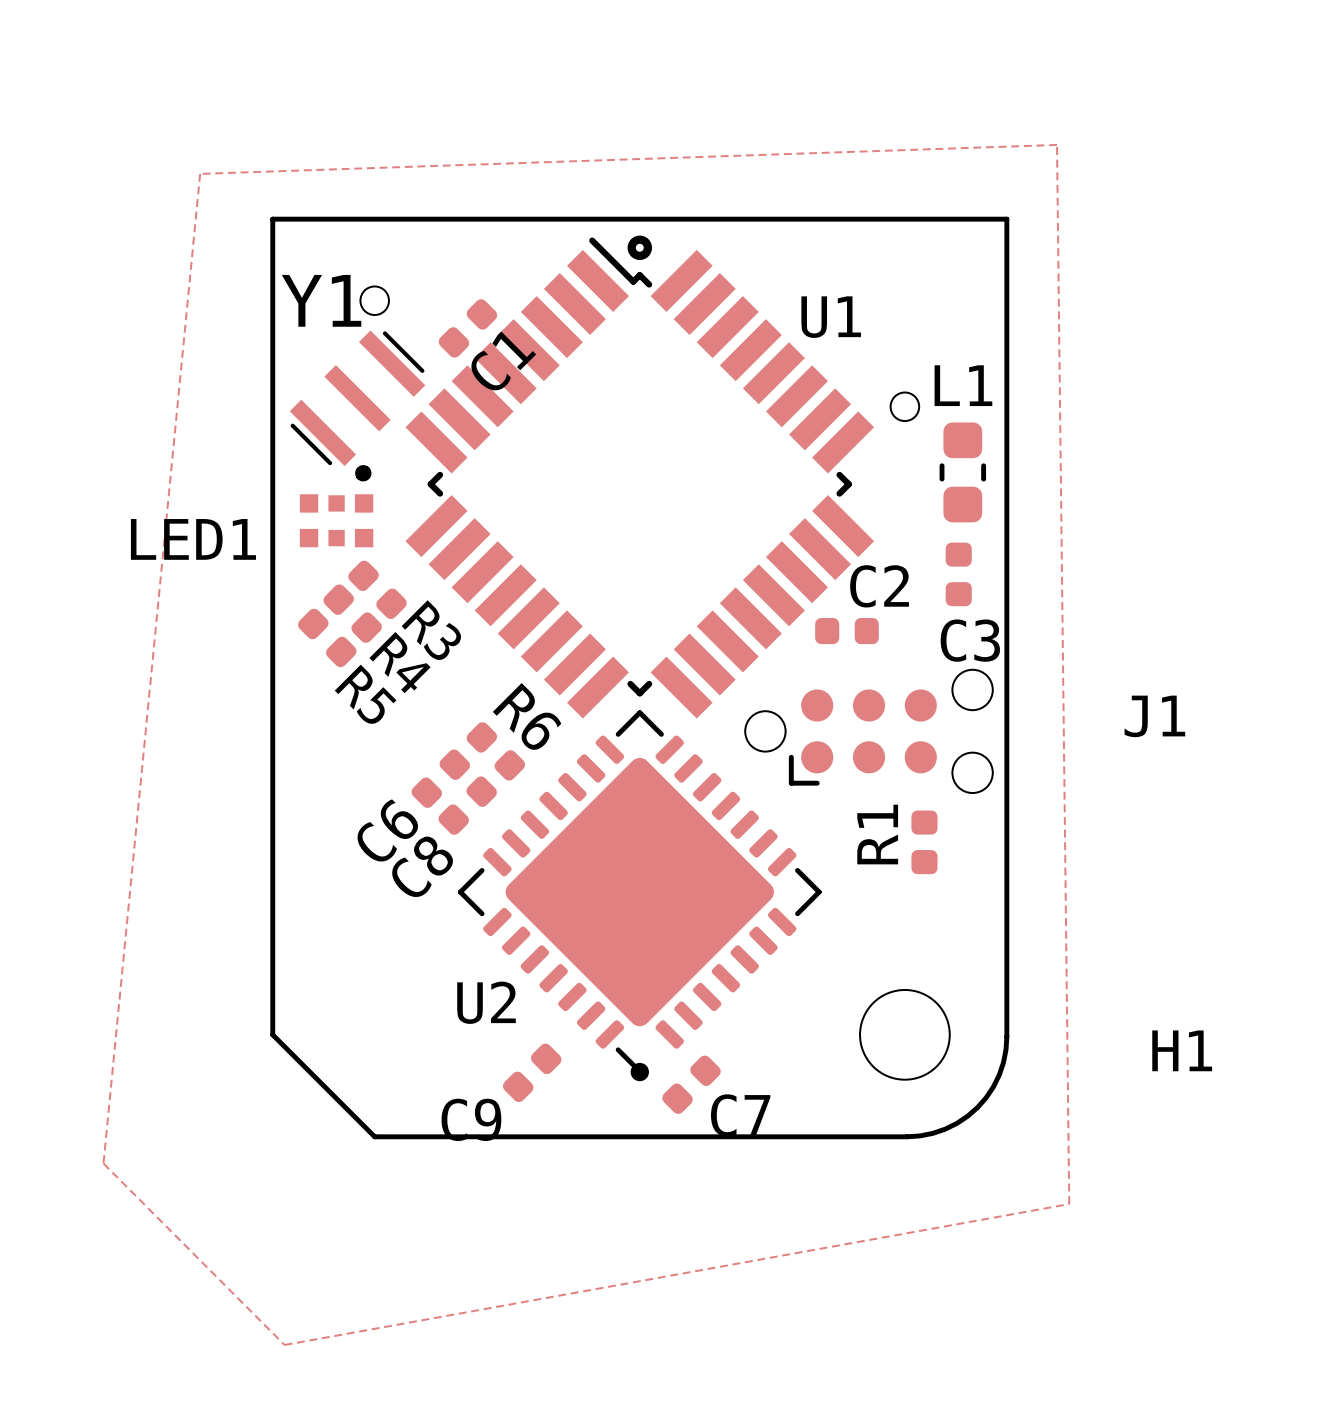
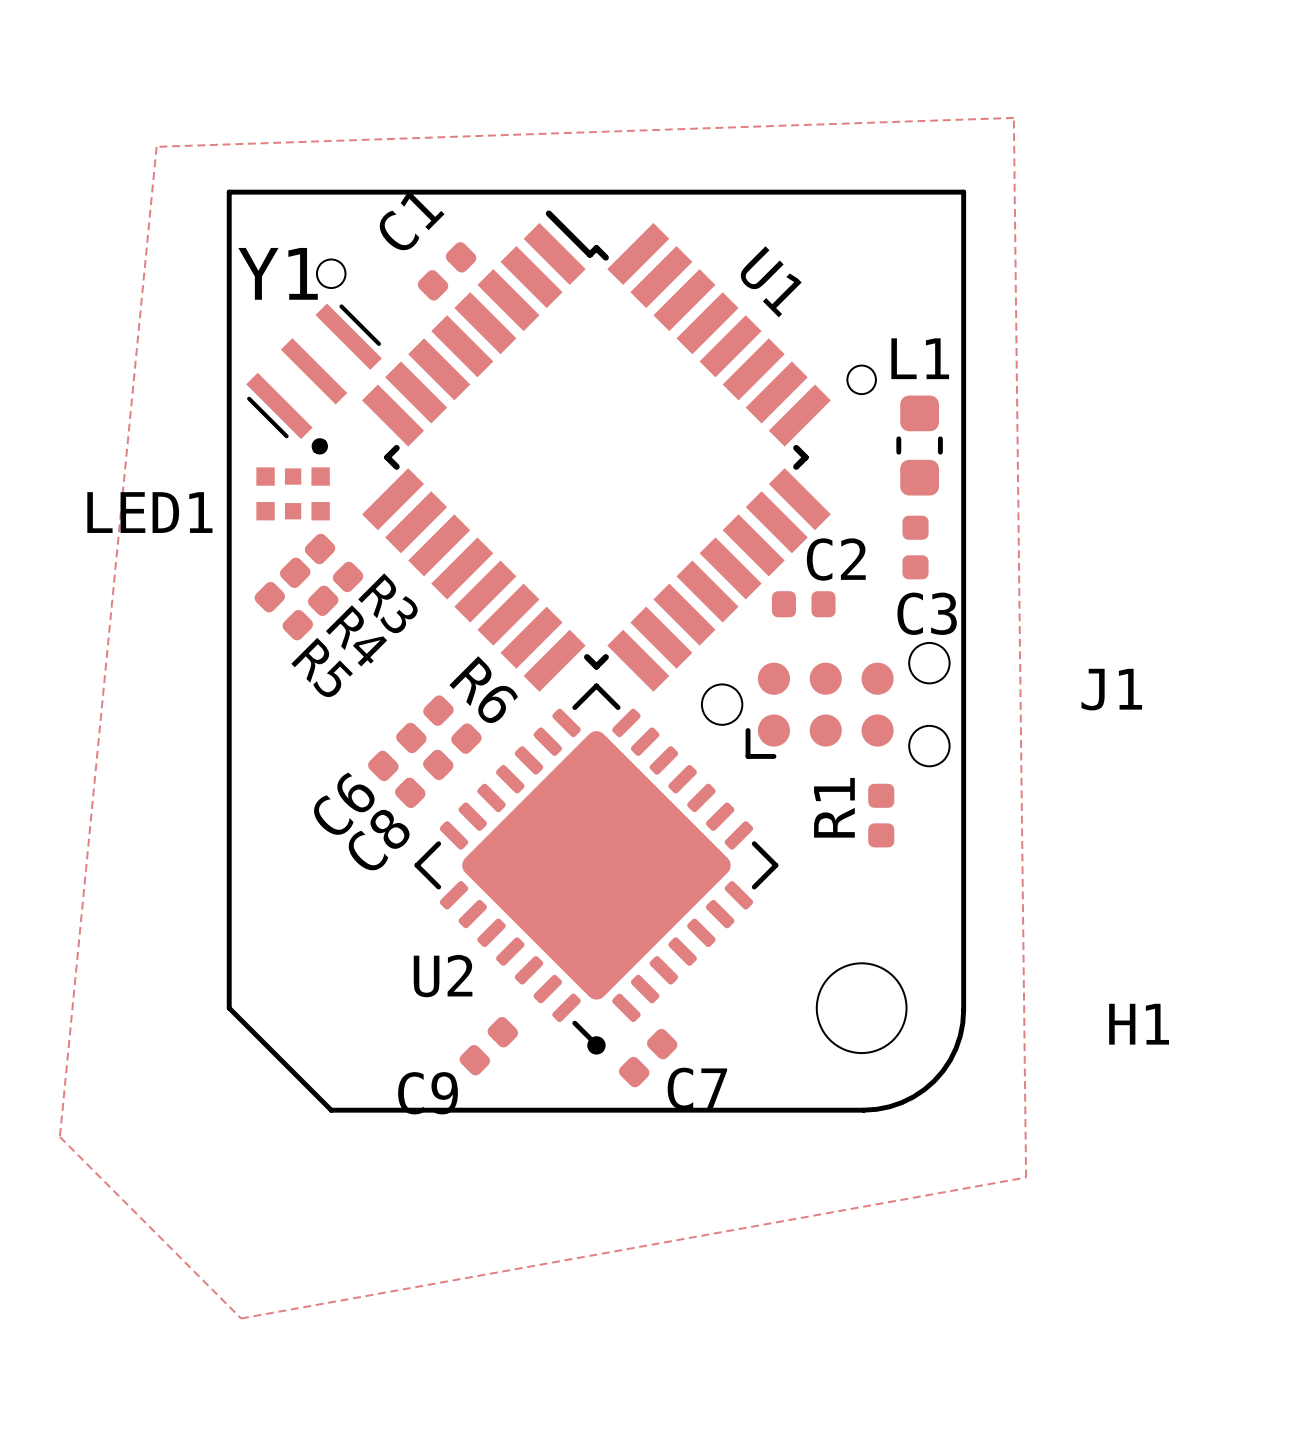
U1 footprint: [405, 235, 875, 719] -> [362, 210, 831, 692]
U1 name rotation: 0° (831, 317) -> 45° clockwise (771, 281)
C1 position: (467, 328) -> (447, 271)
C1 name position: C1 (503, 361) -> C1 (411, 221)

